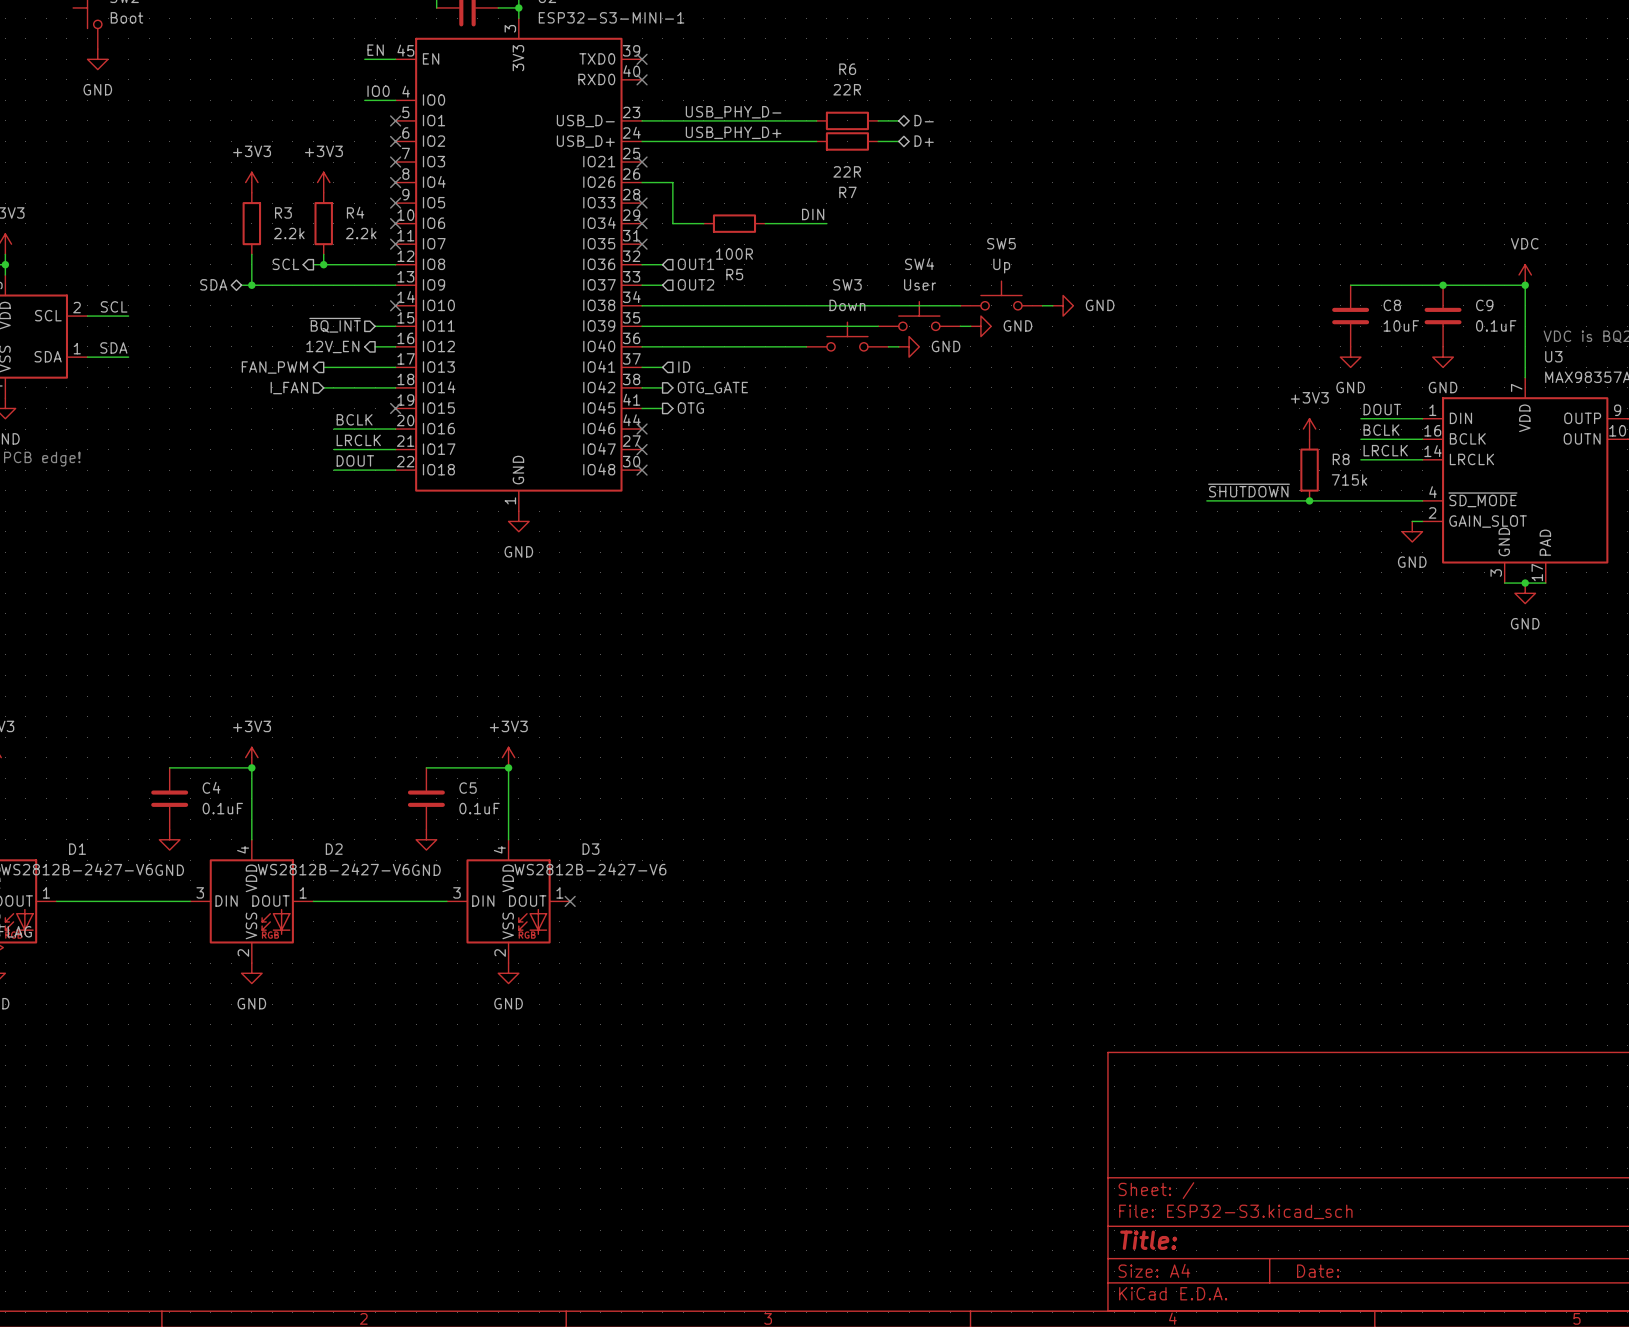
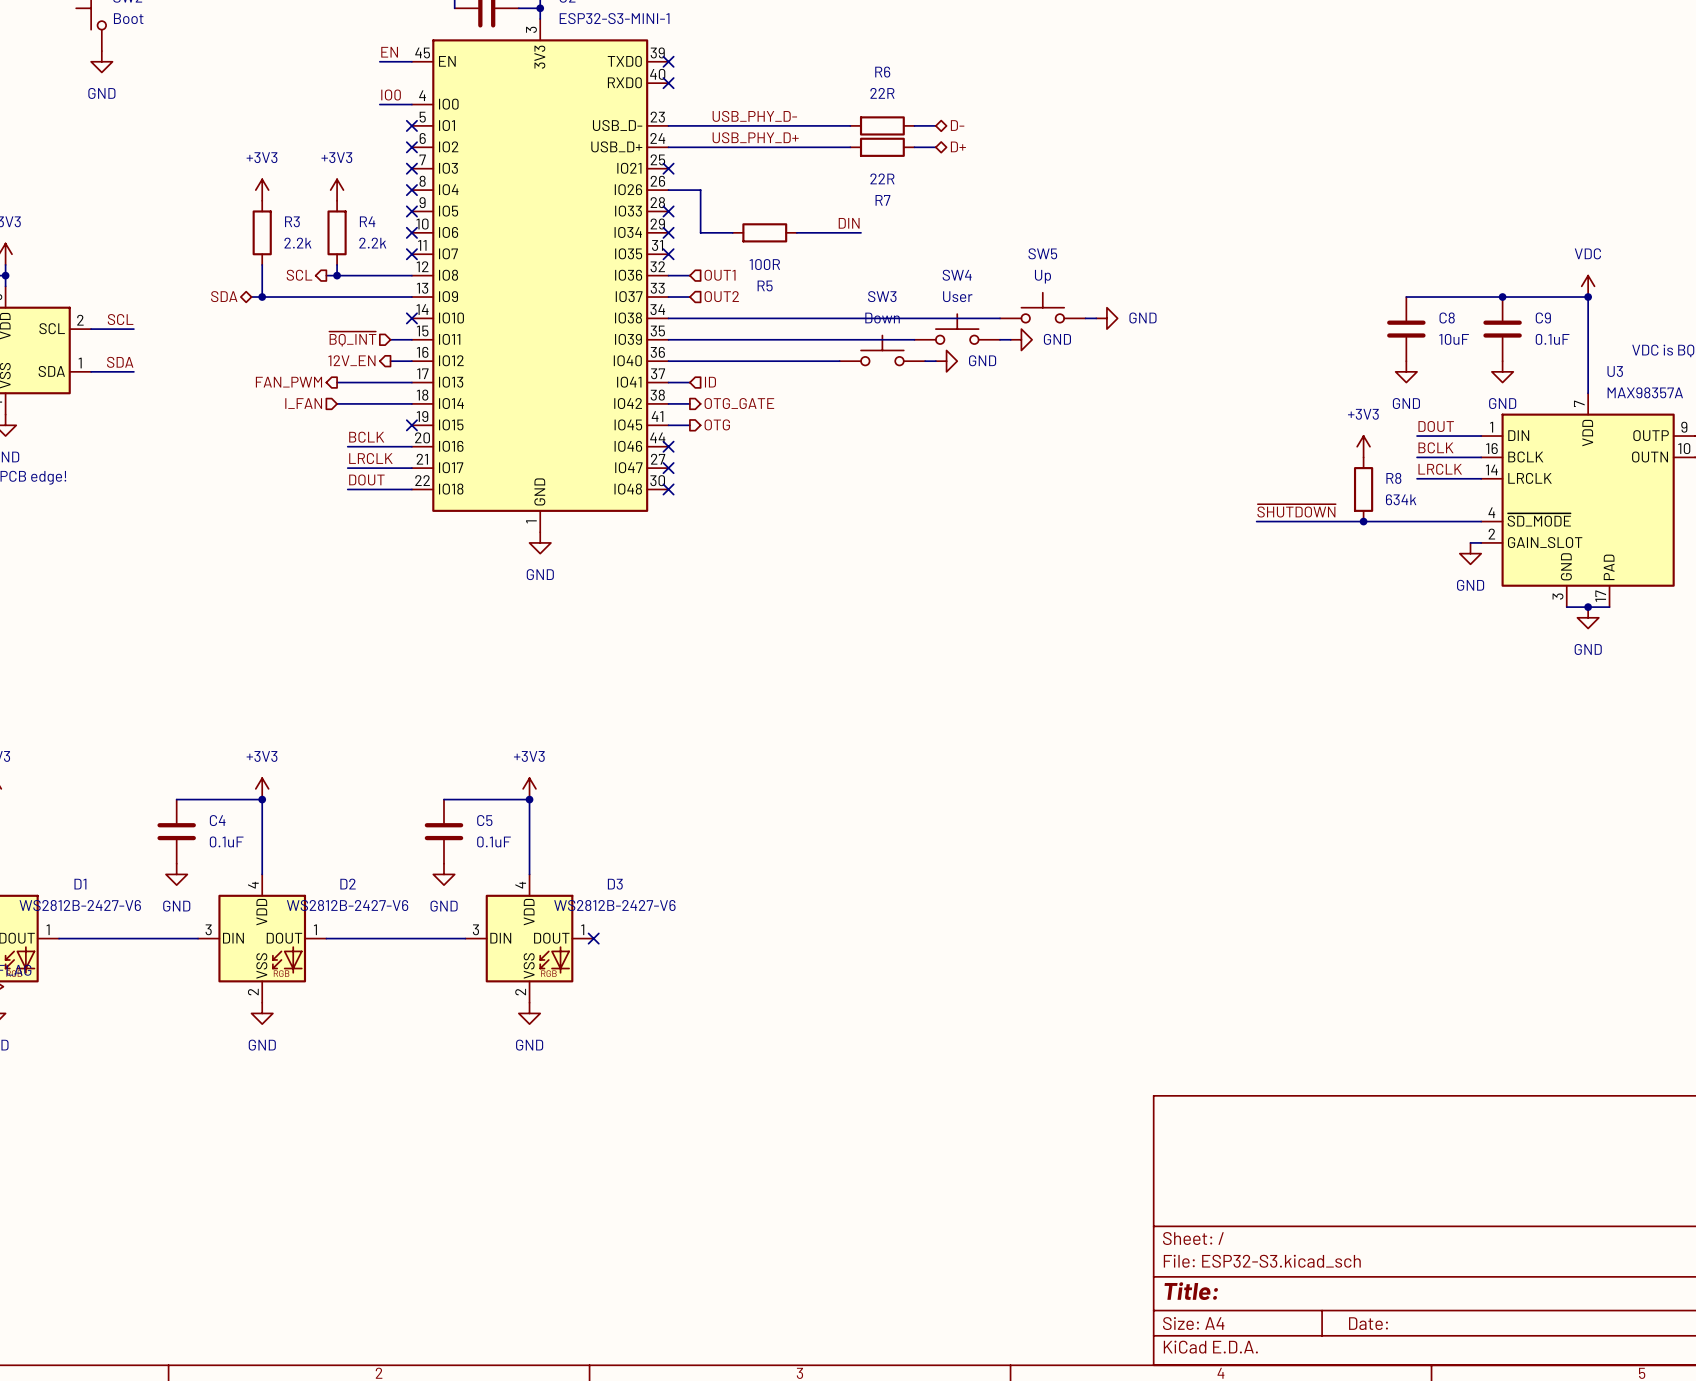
R8 value: 715k (1349, 479) -> 634k (1401, 499)

